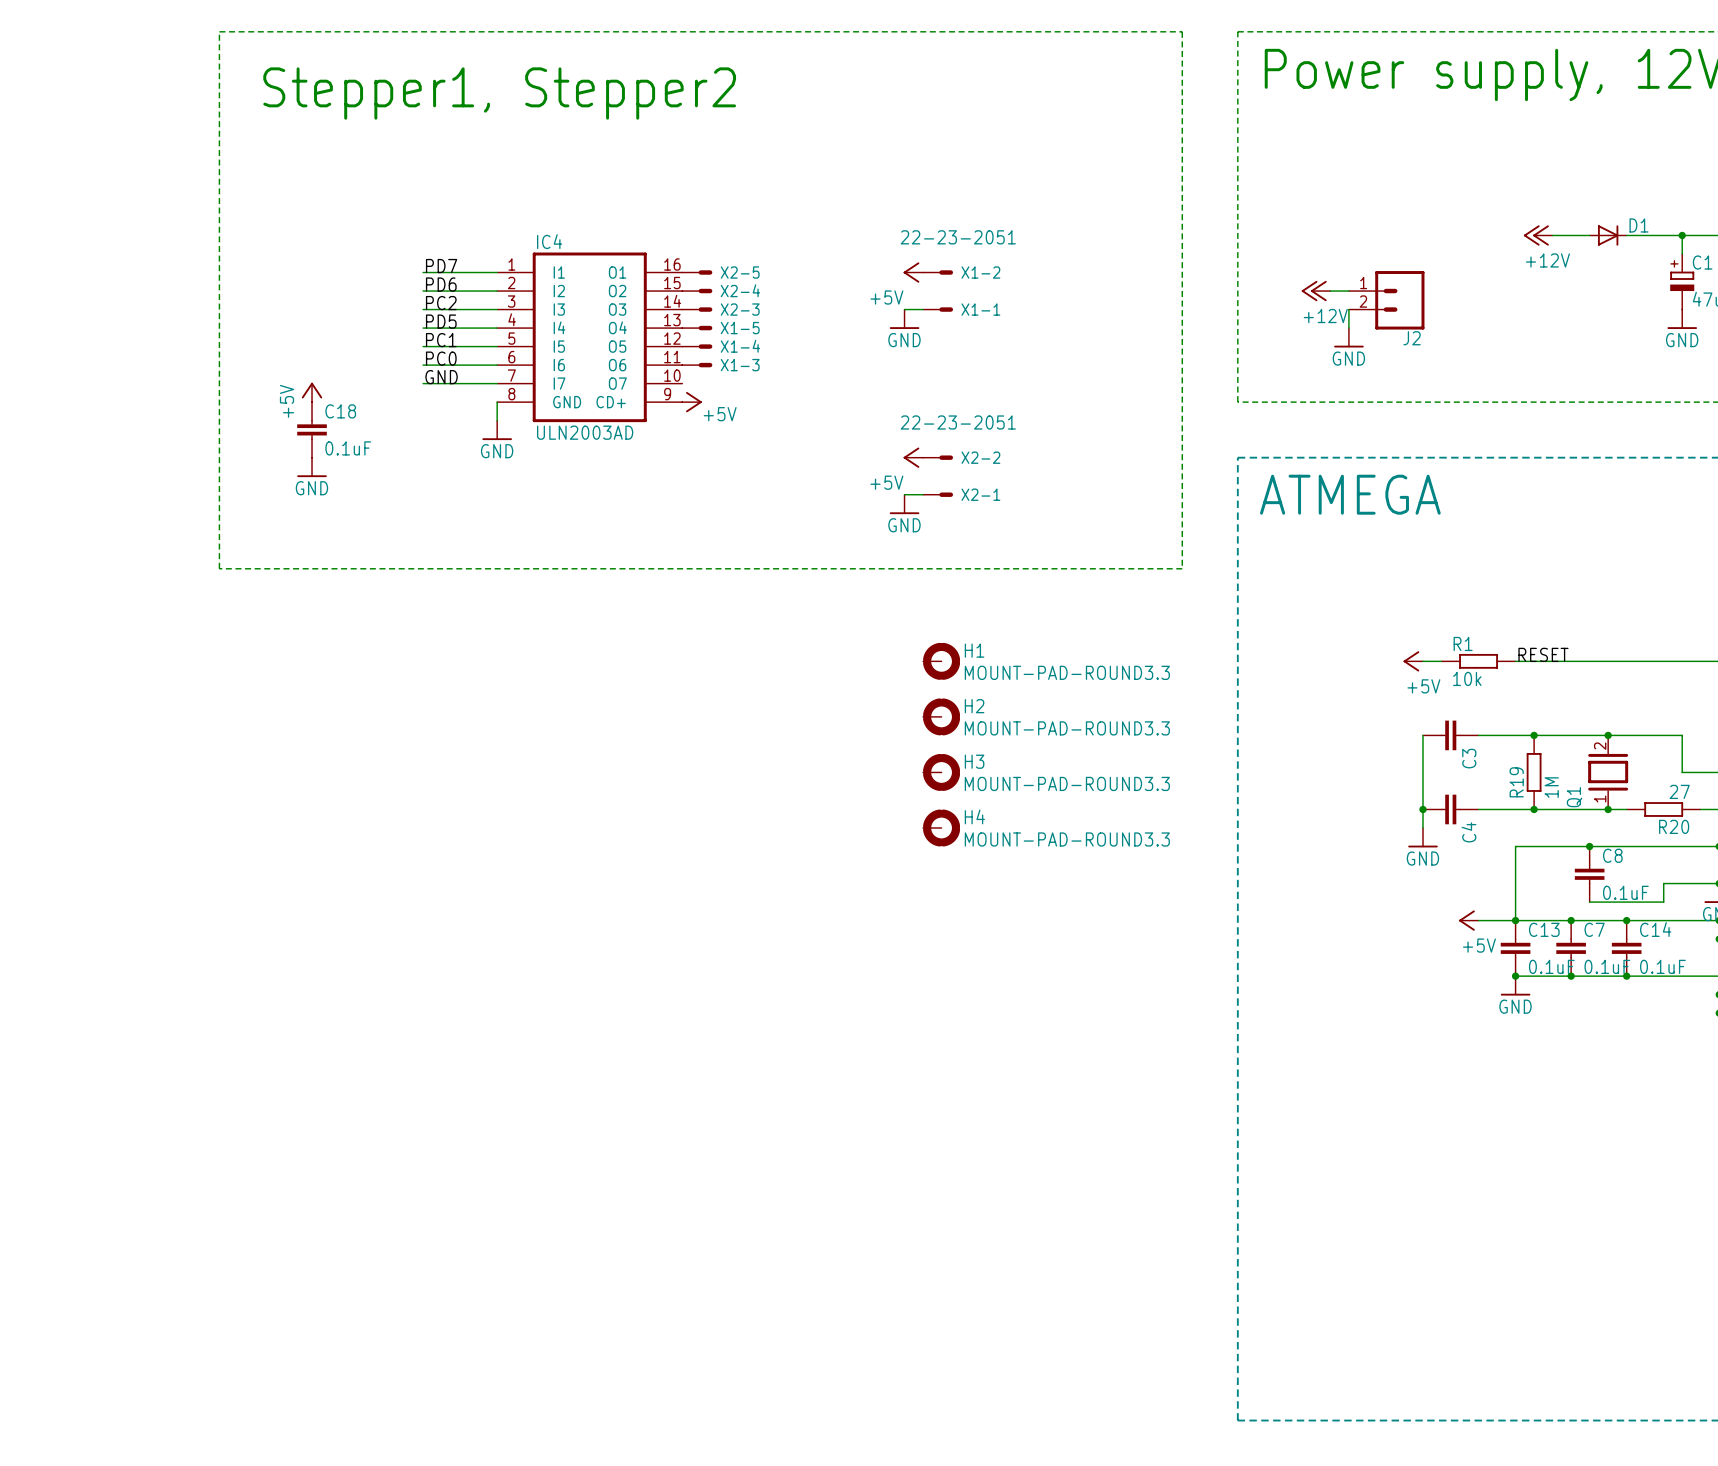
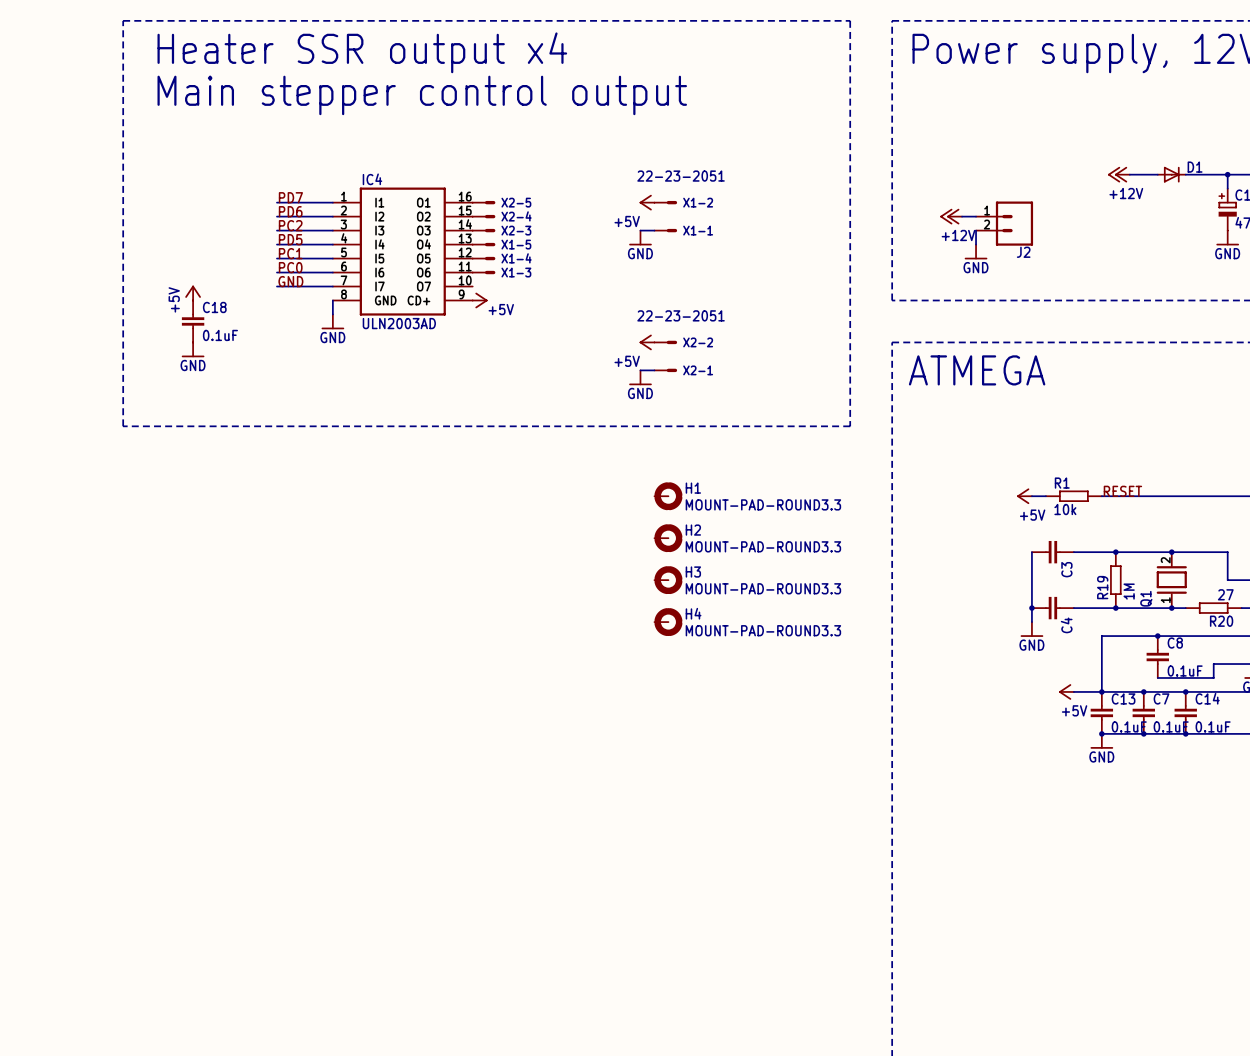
text: none -> Heater SSR output x4 (362, 52)
text: Stepper1, Stepper2 (499, 93) -> none
text: none -> Main stepper control output (422, 95)

